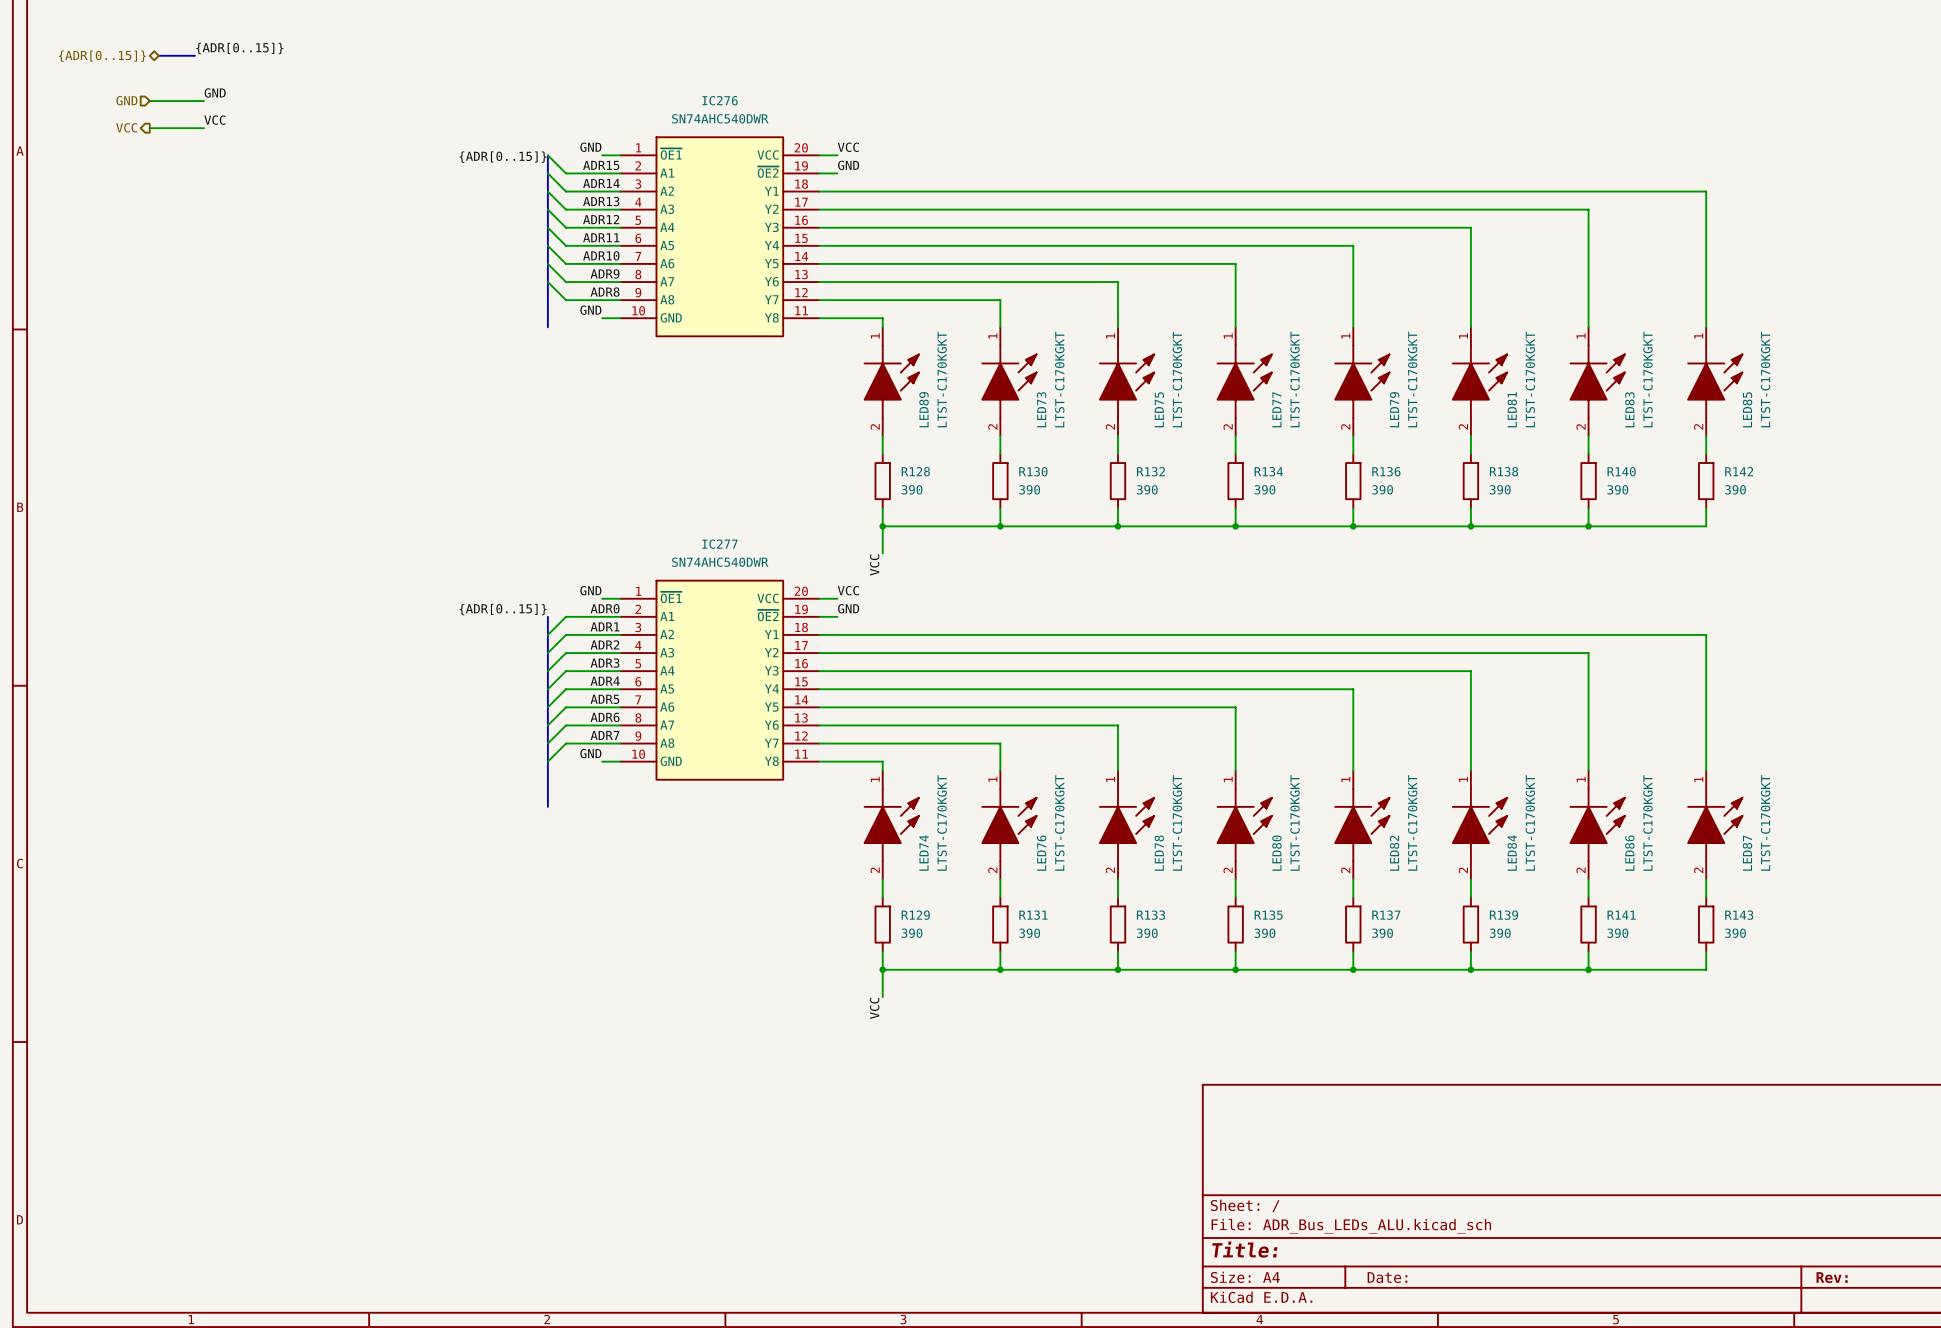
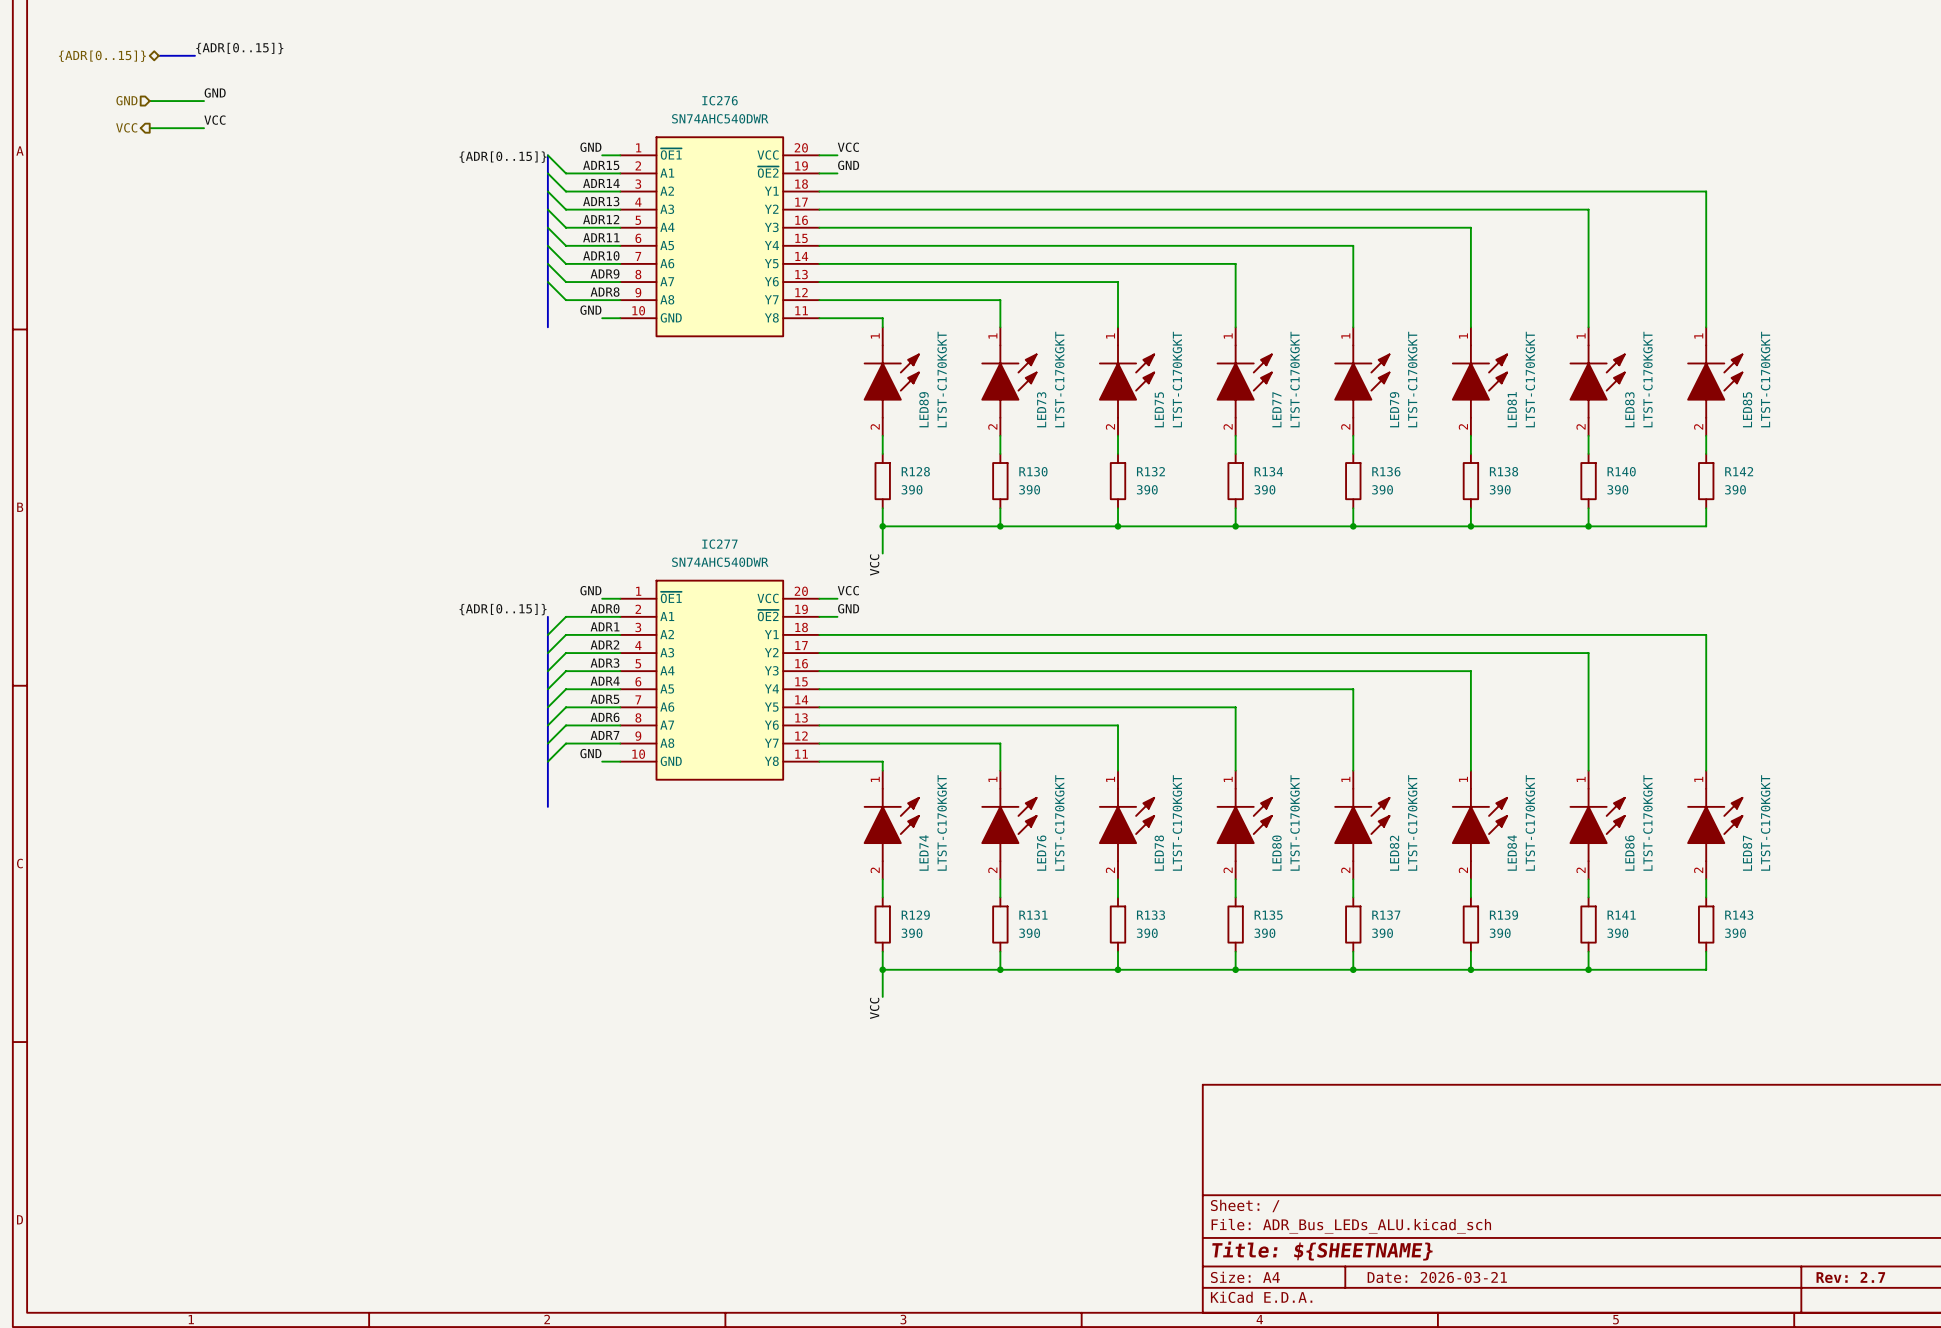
title block: Title: (1244, 1249) -> Title: ${SHEETNAME} (1322, 1251)
title block: Date: (1387, 1277) -> Date: 2026-03-21 (1437, 1277)
title block: Rev: (1832, 1277) -> Rev: 2.7 (1850, 1277)

